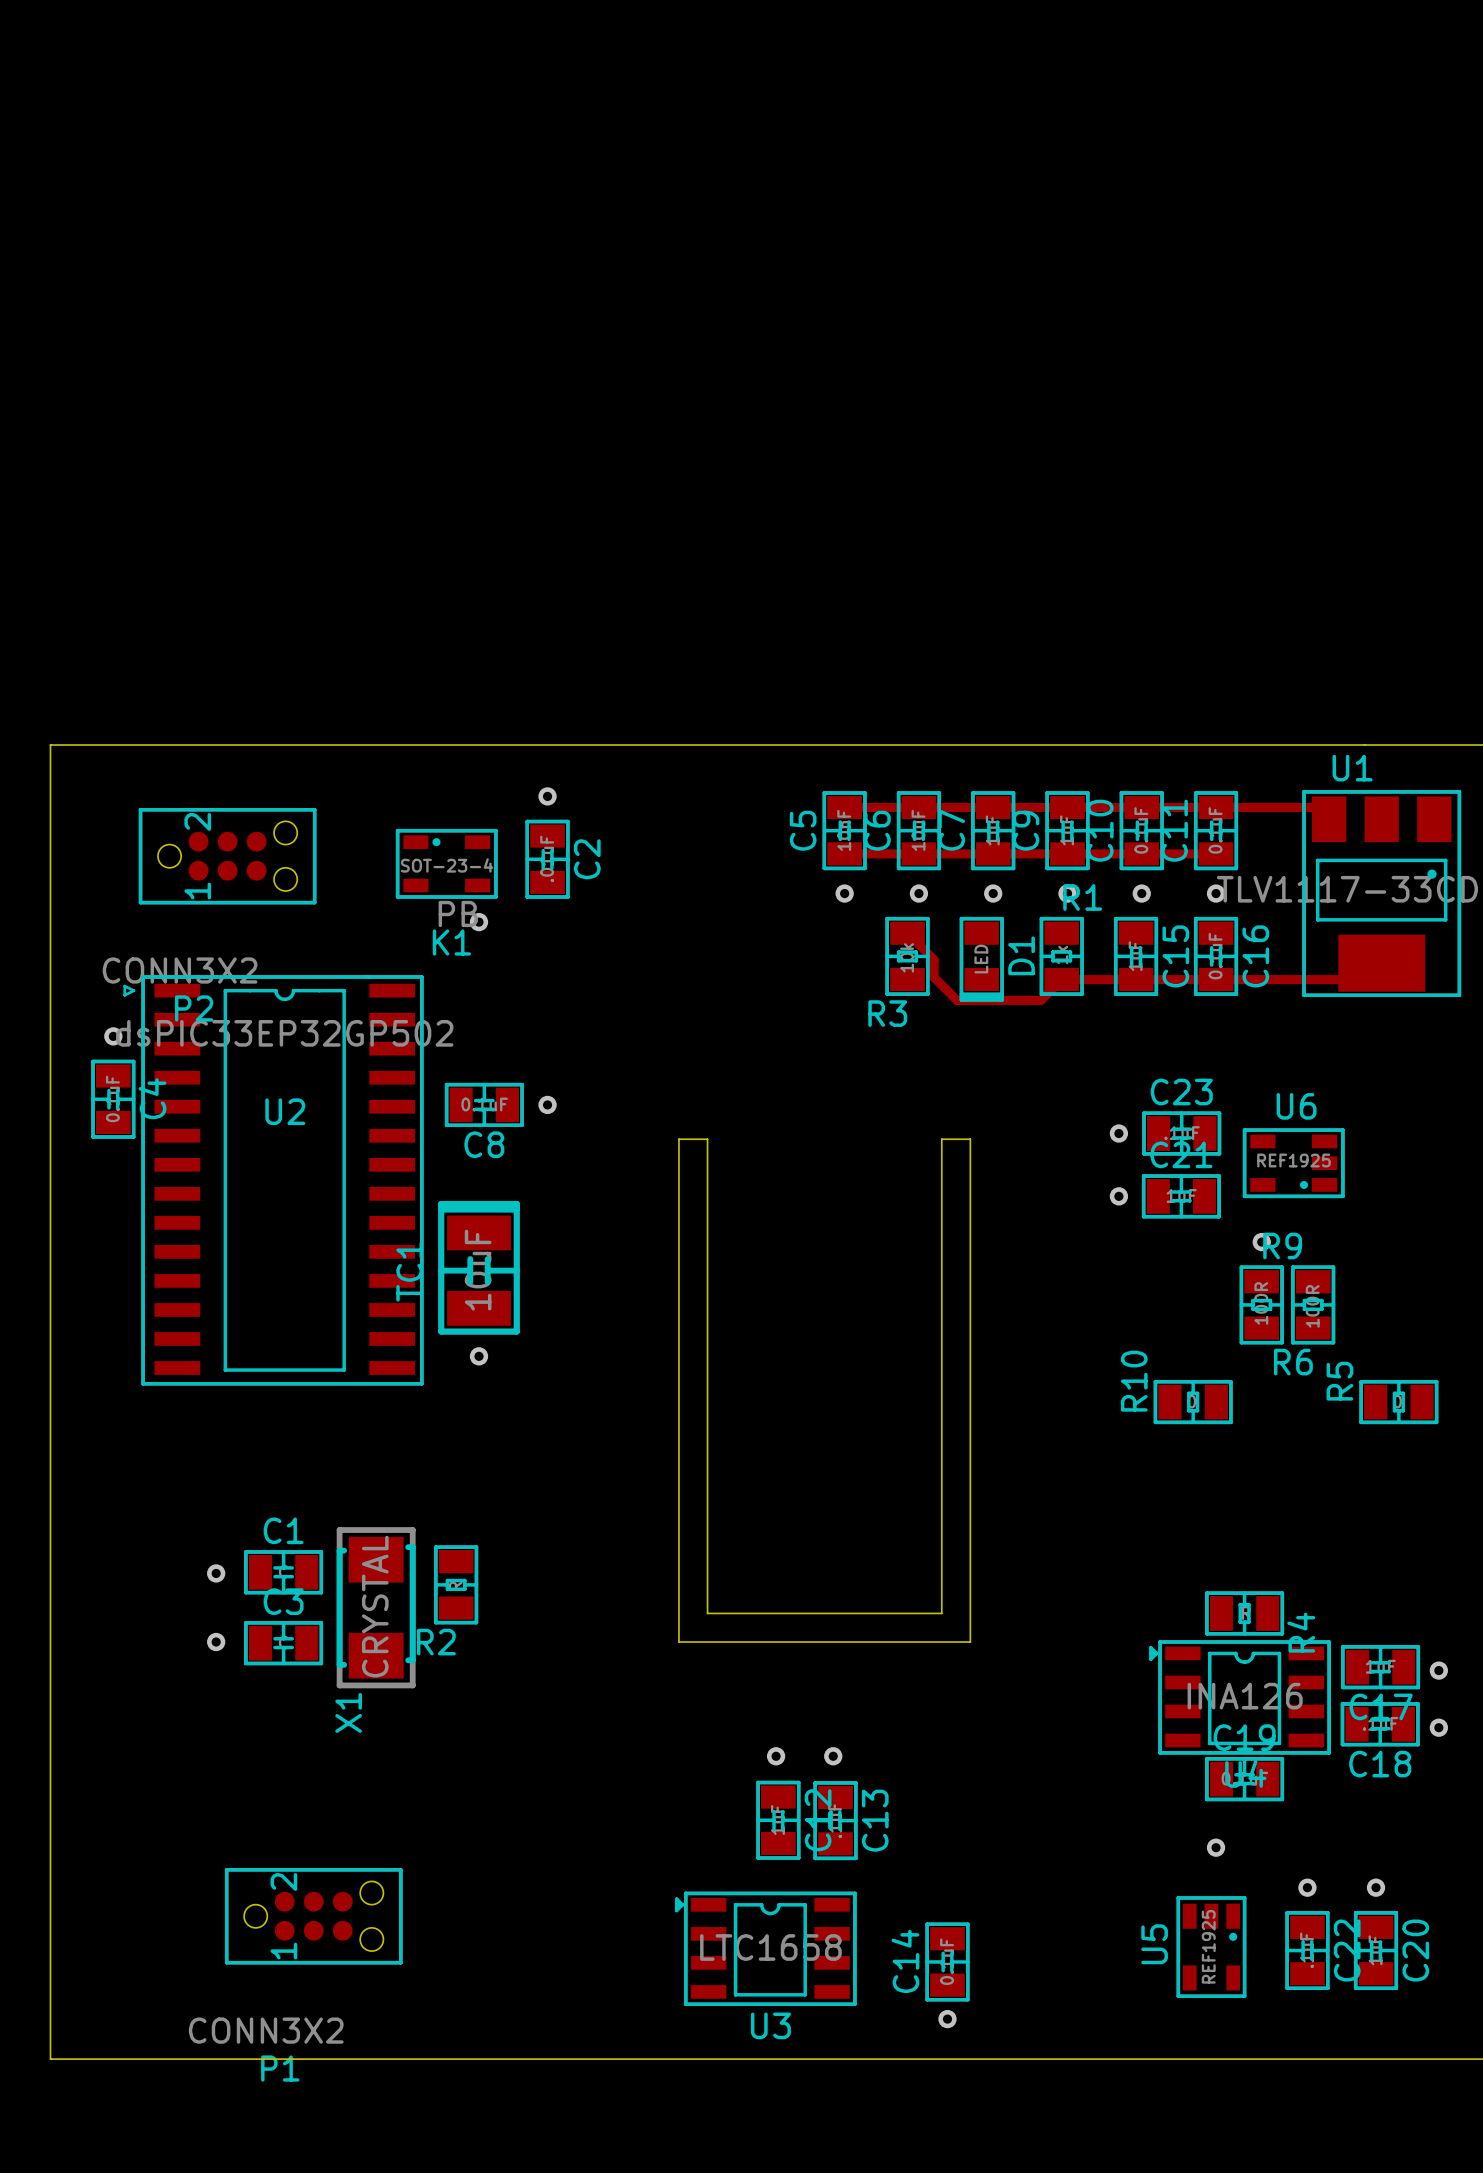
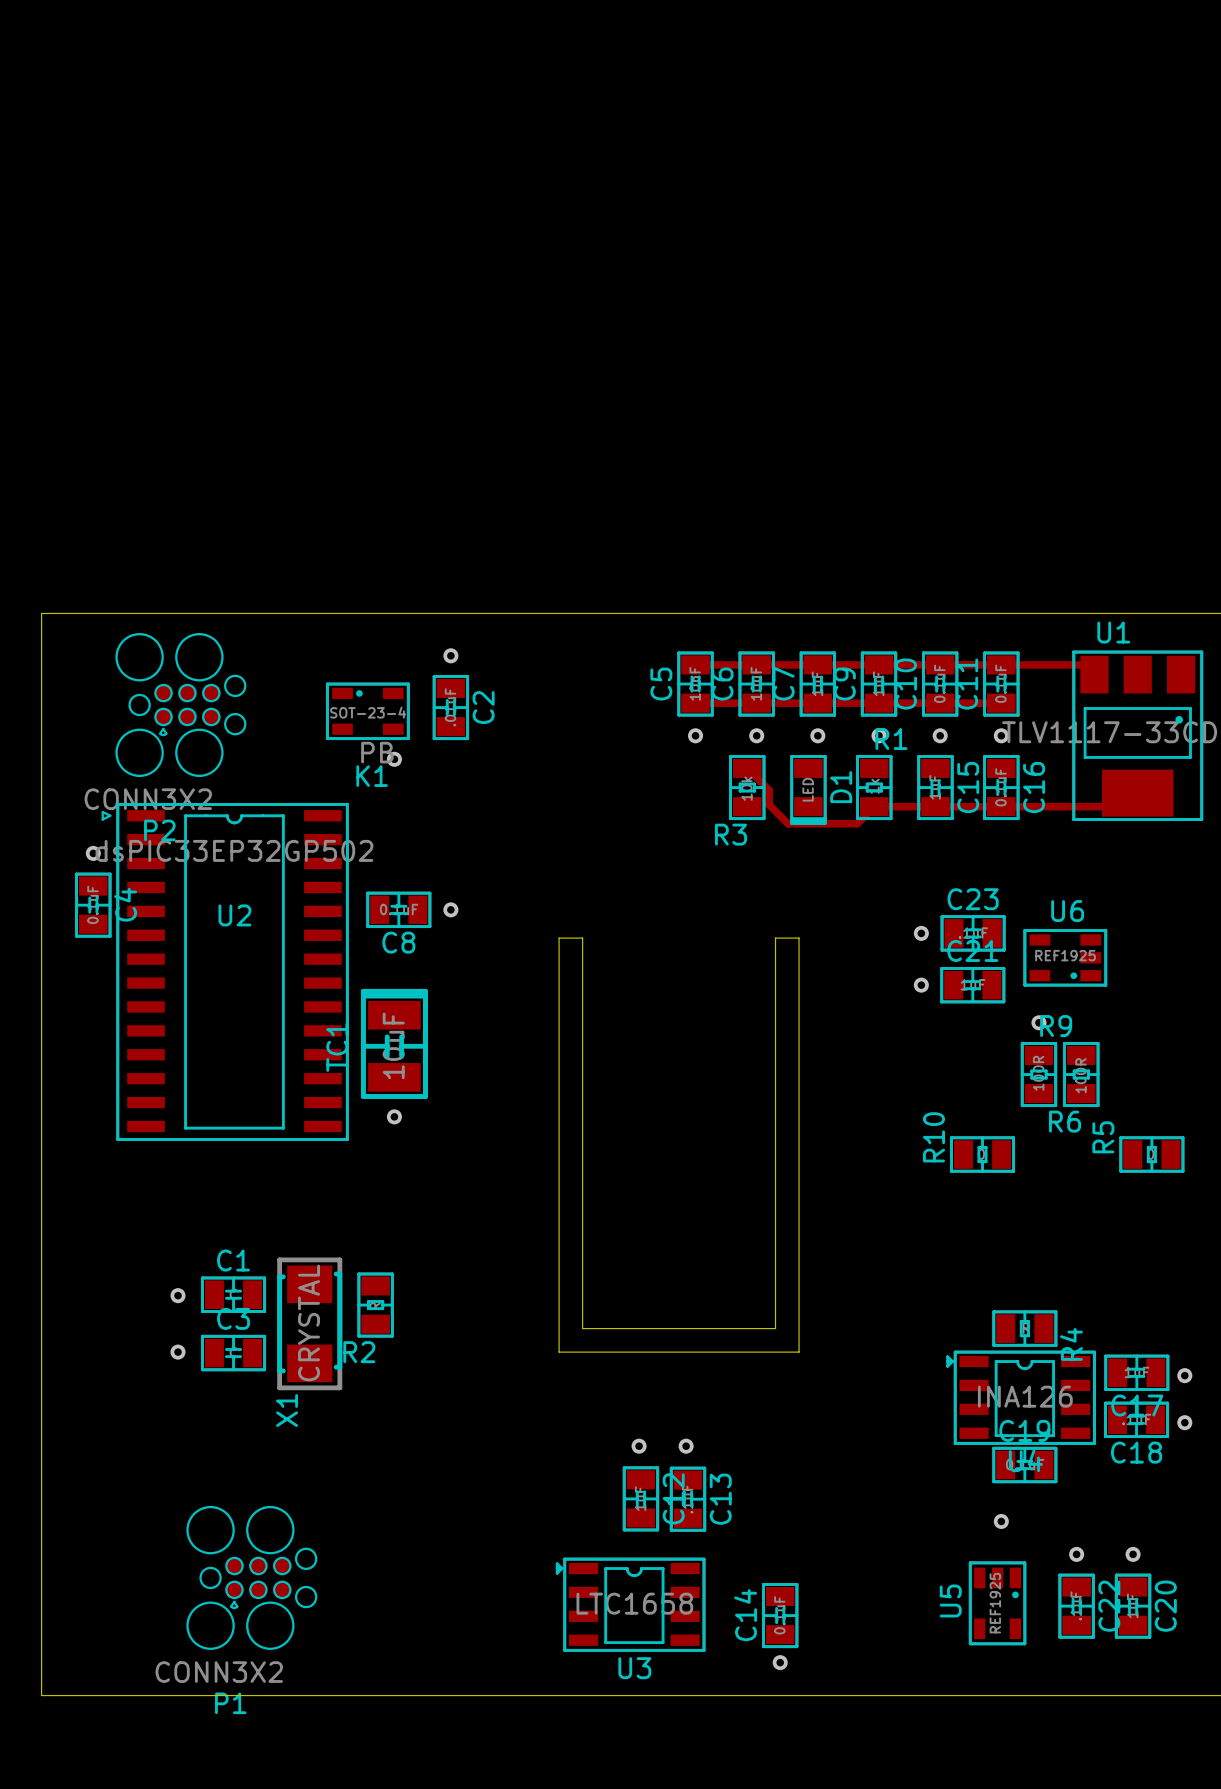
P2 footprint: [138, 808, 317, 905] -> [115, 633, 247, 778]
P1 footprint: [224, 1868, 403, 1965] -> [186, 1505, 318, 1650]

